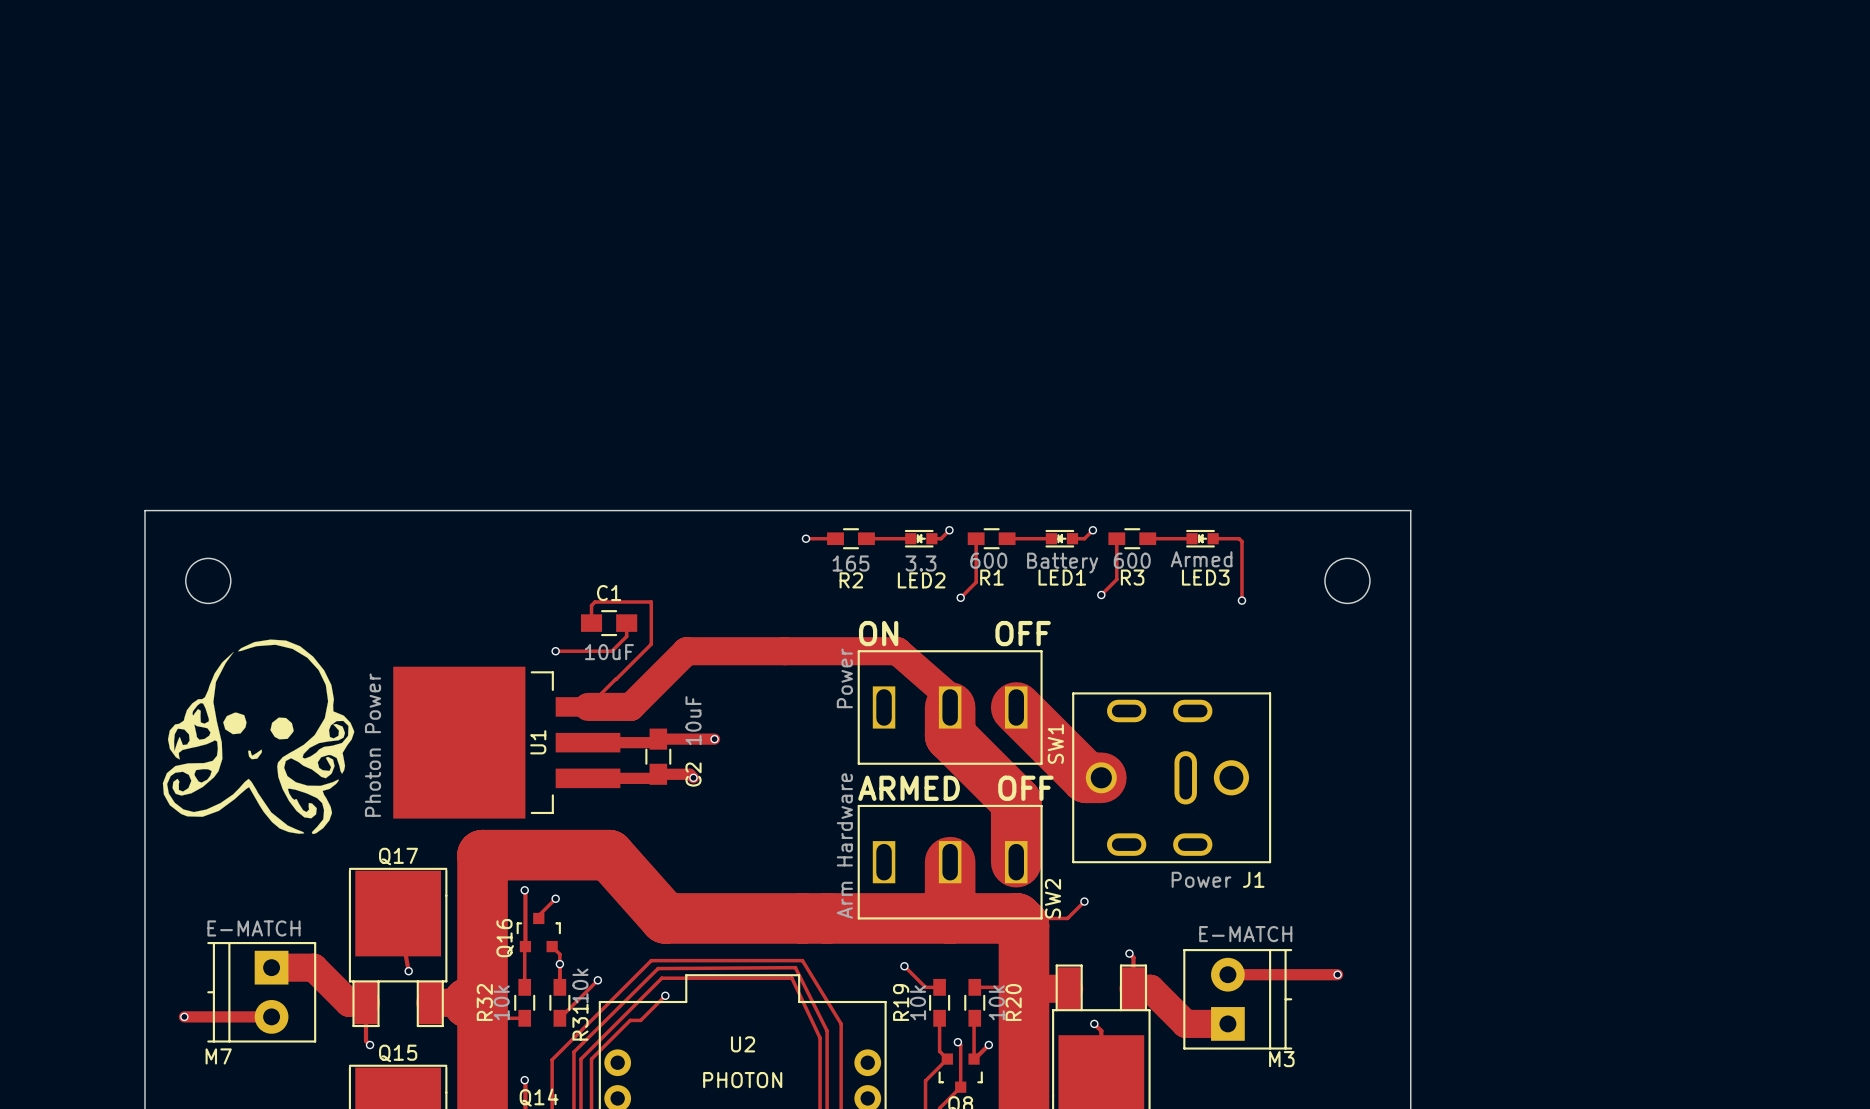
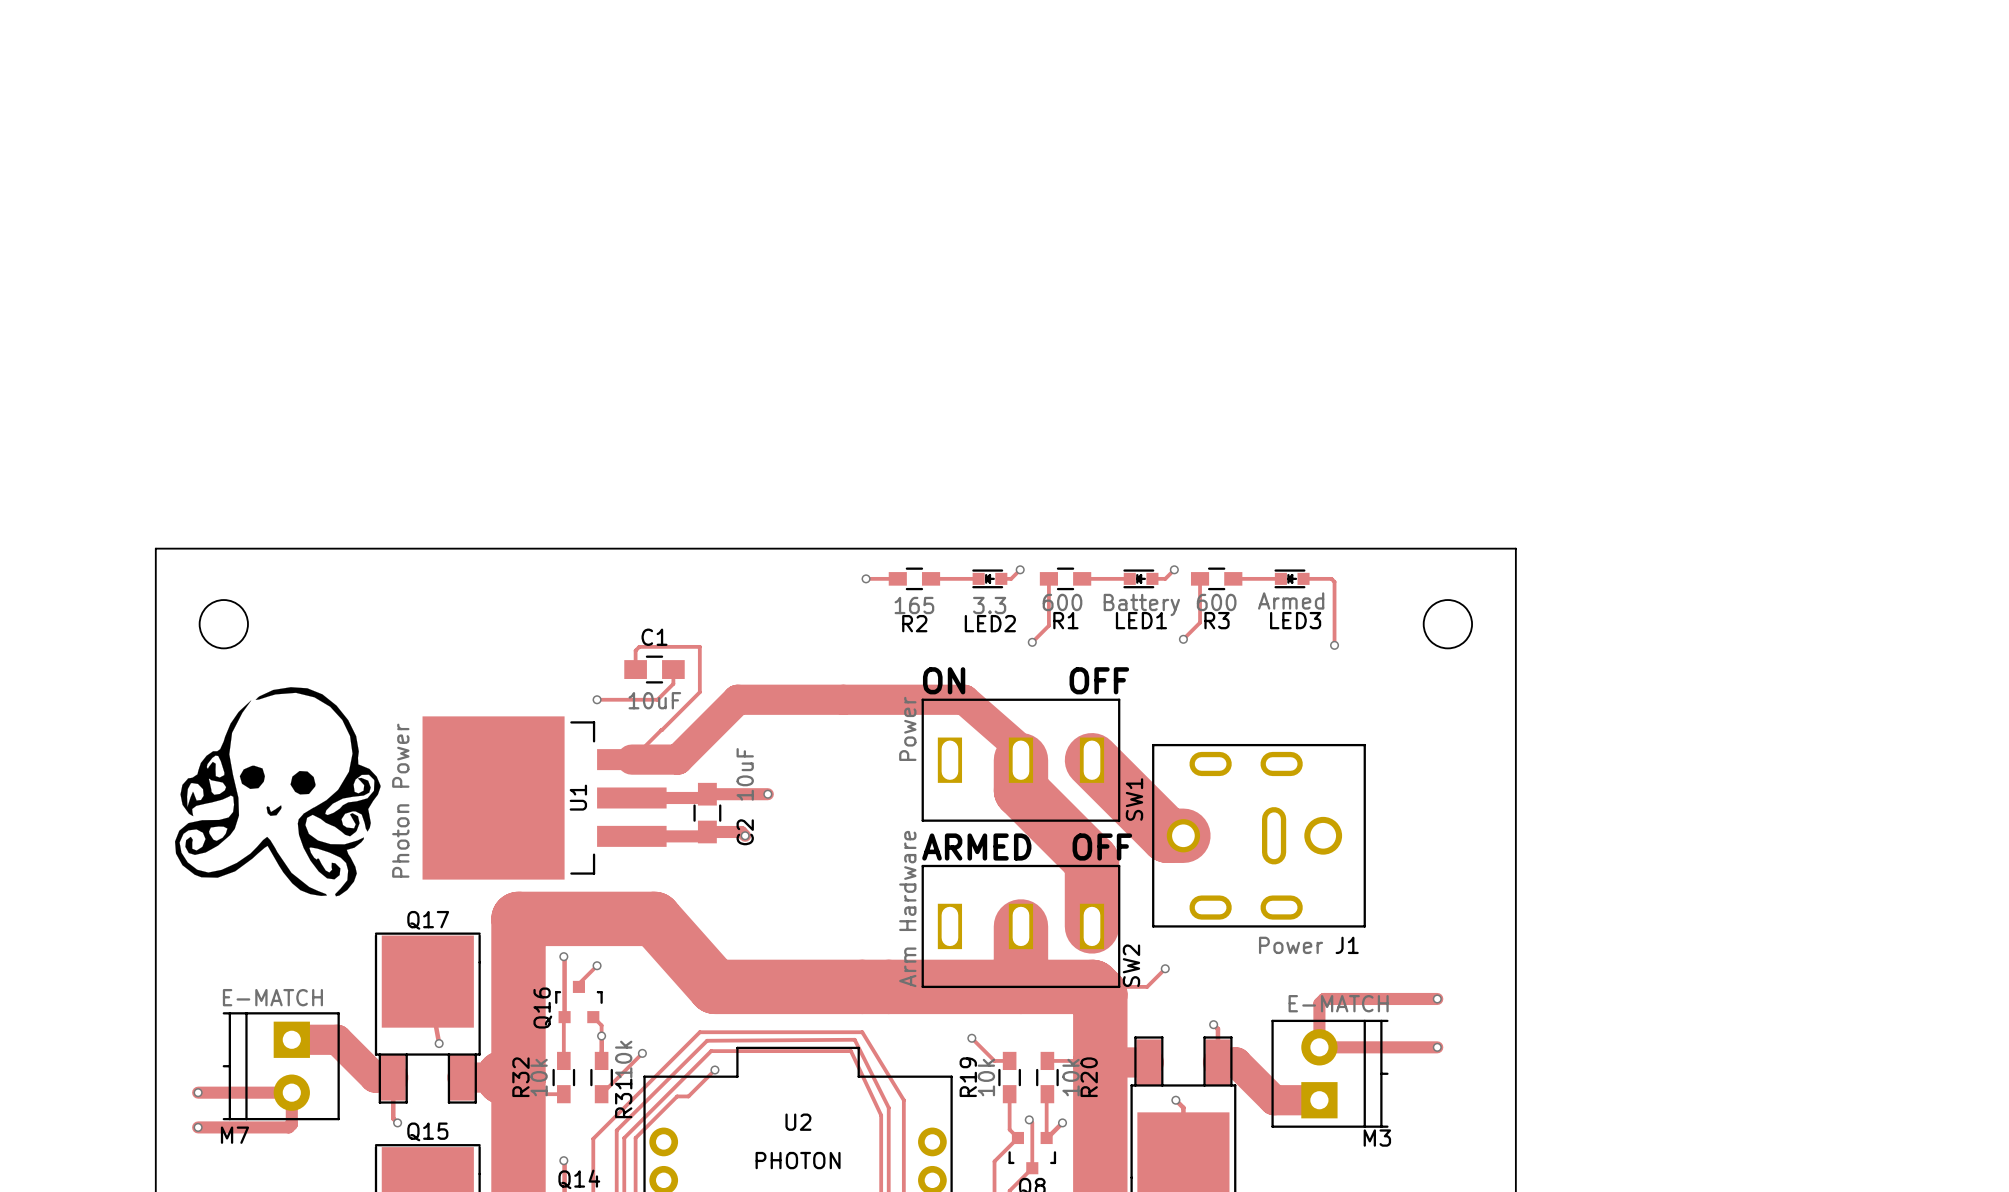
track: none -> (1437, 998) (1323, 998) (1319, 1003) (1319, 1047)
via: none -> (1437, 998)
track: none -> (291, 1092) (291, 1124) (288, 1127) (198, 1127)
via: none -> (198, 1127)

